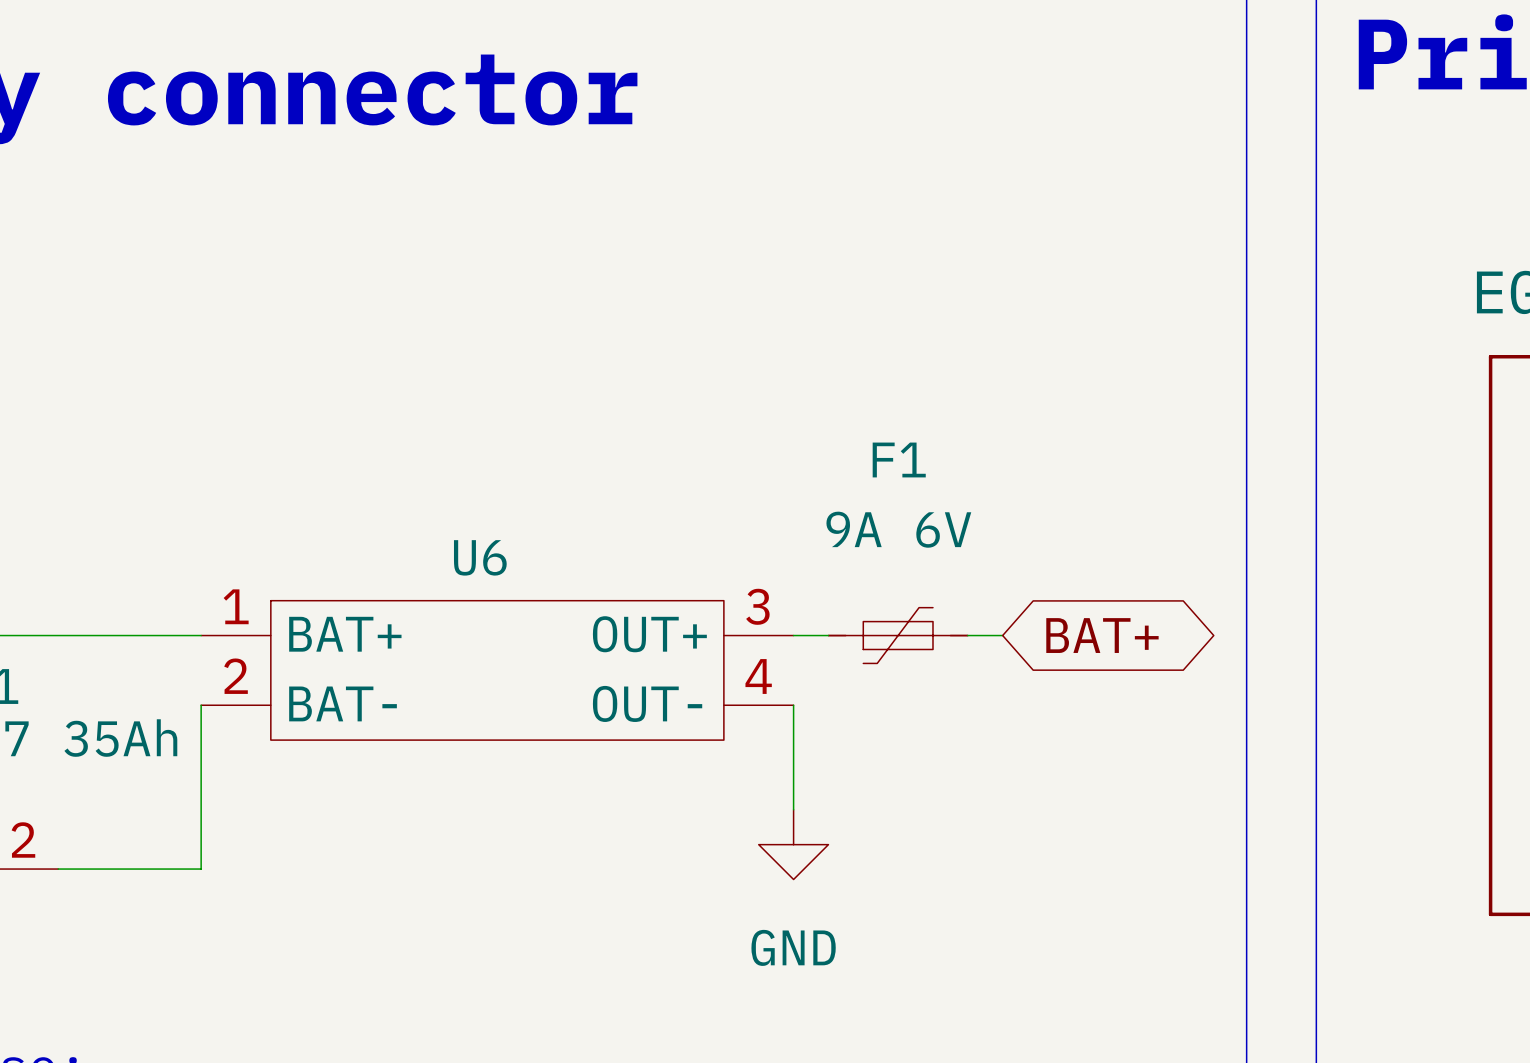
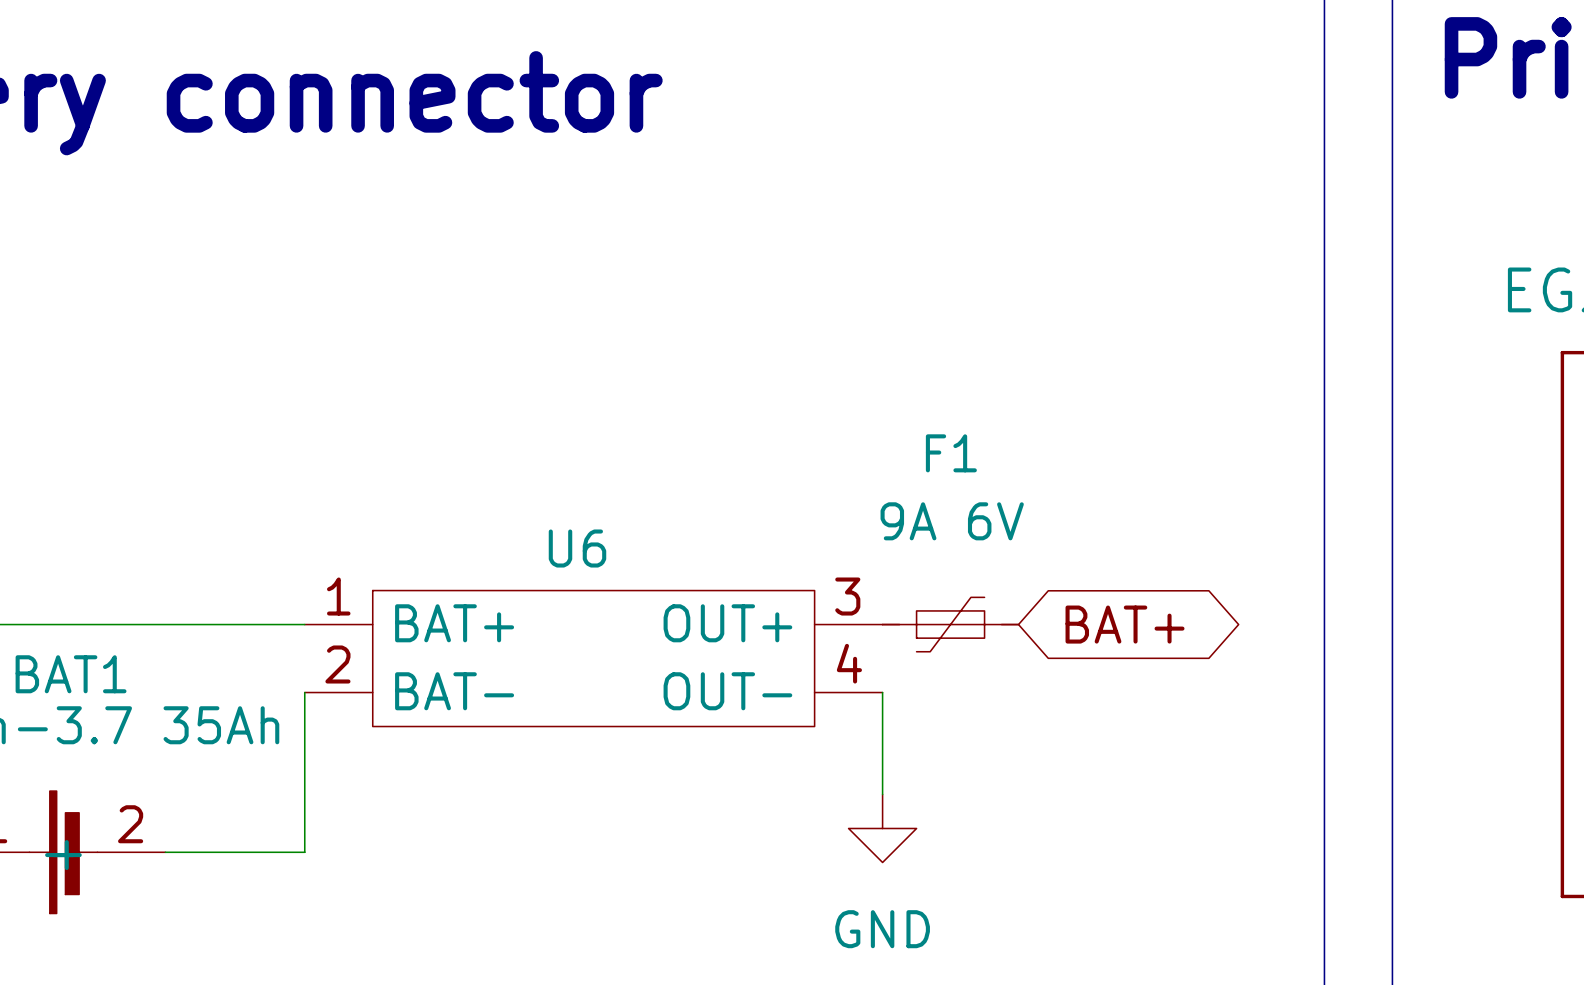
F1 position: (898, 635) -> (950, 624)
wire: (967, 635) (1002, 635) -> none
global label position: BAT+ (1102, 635) -> BAT+ (1125, 624)

